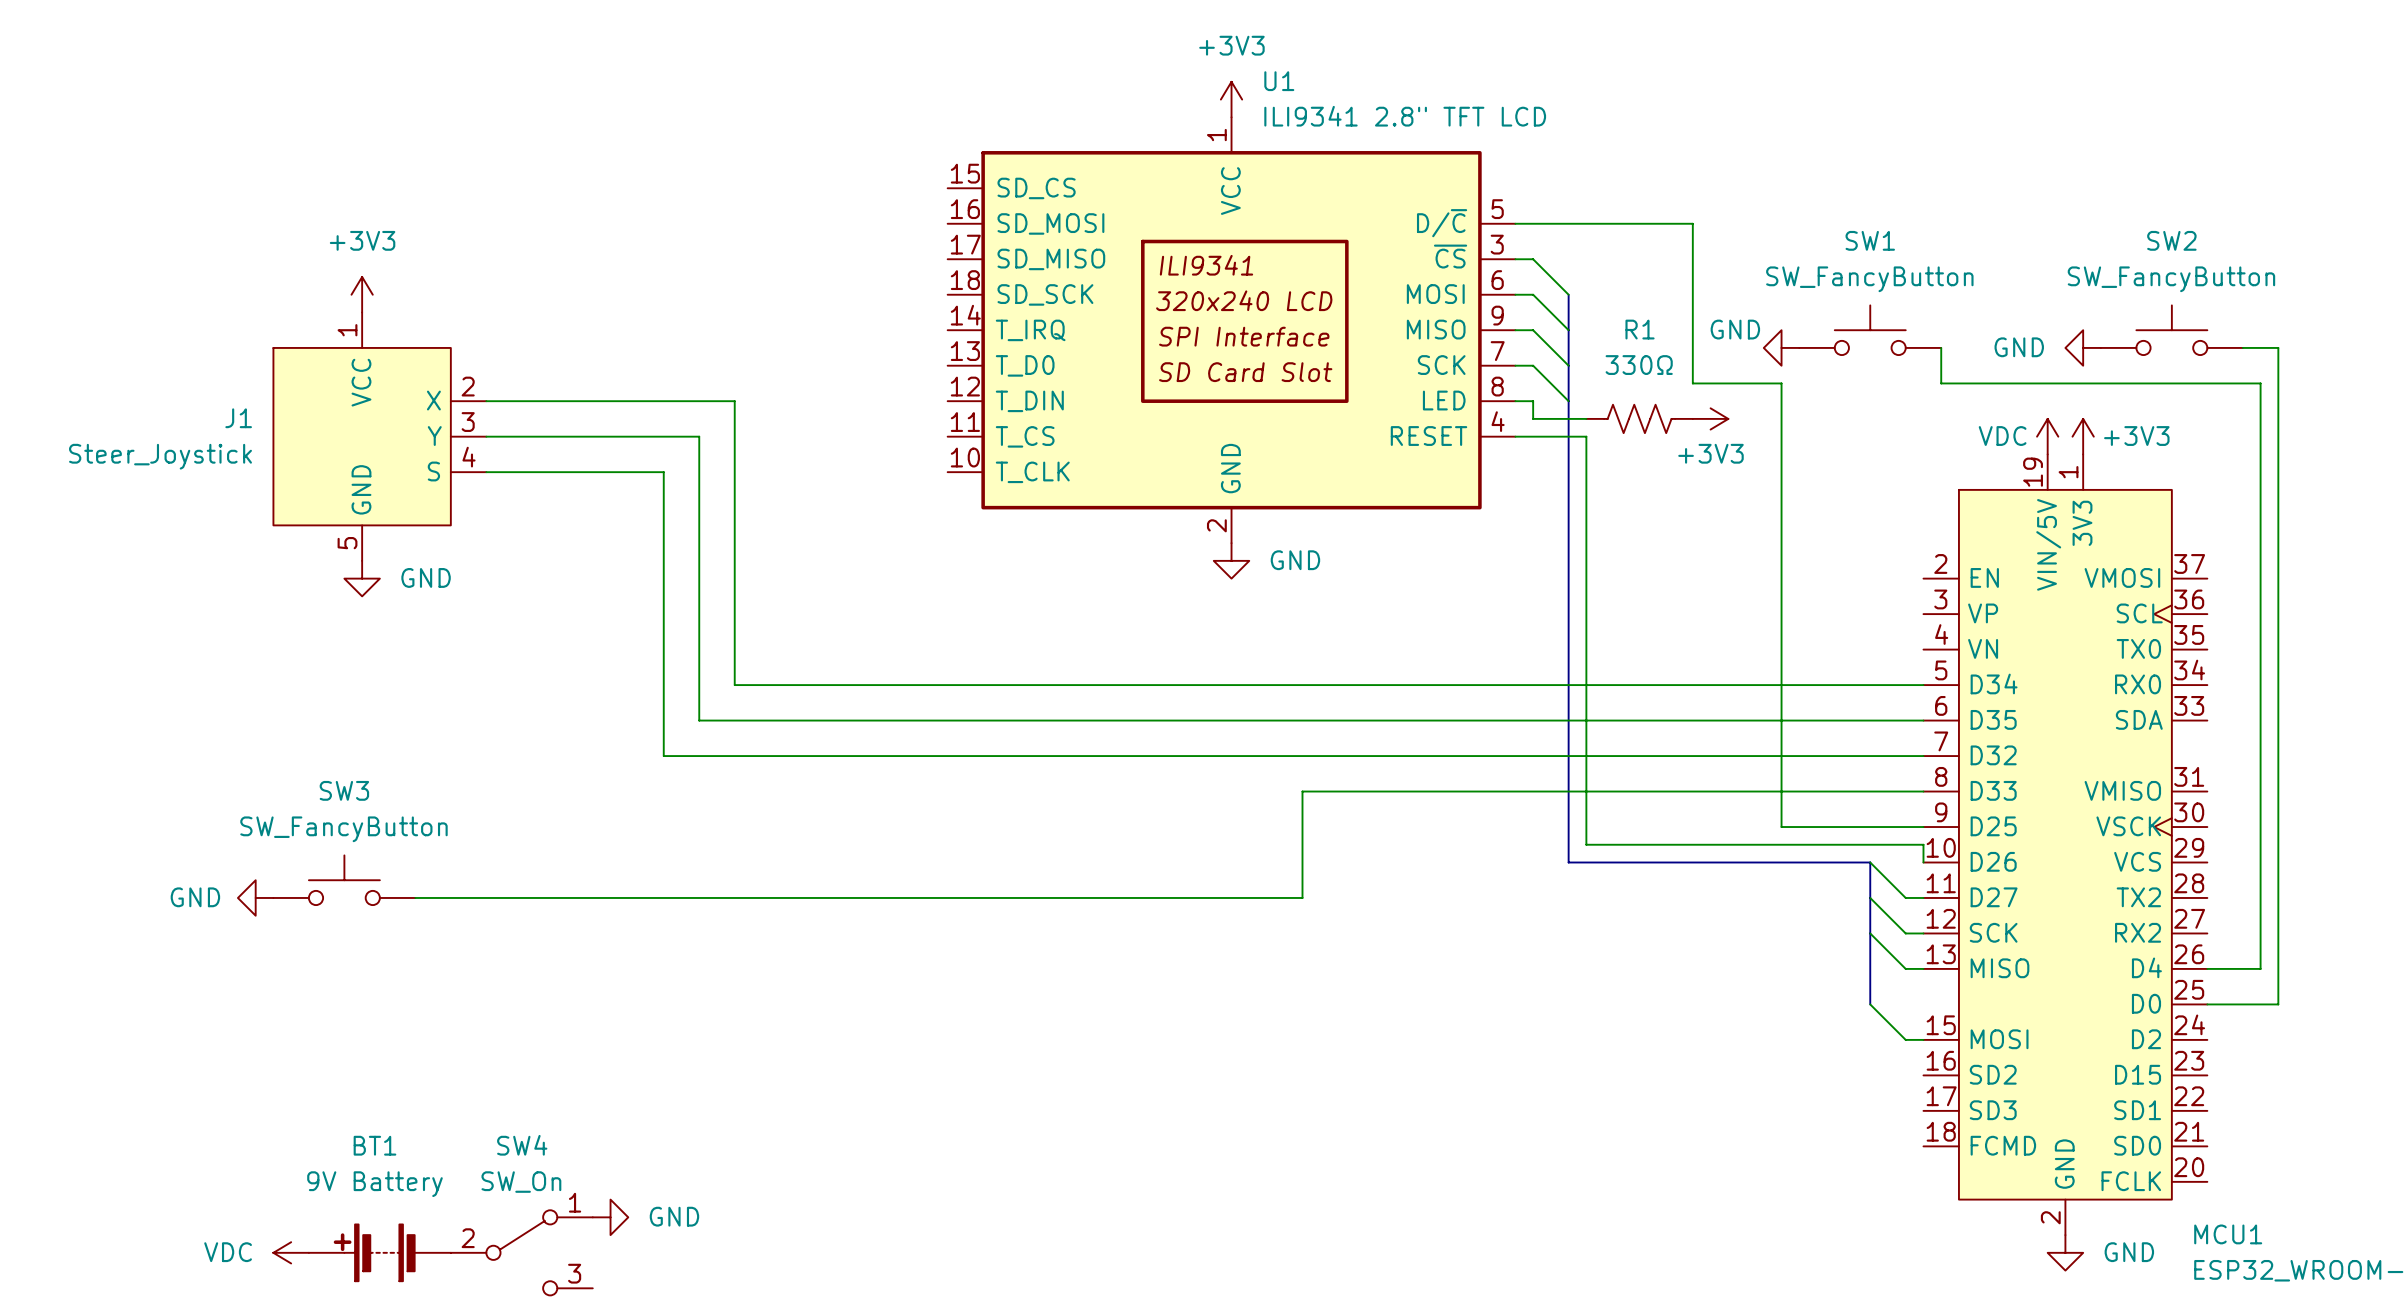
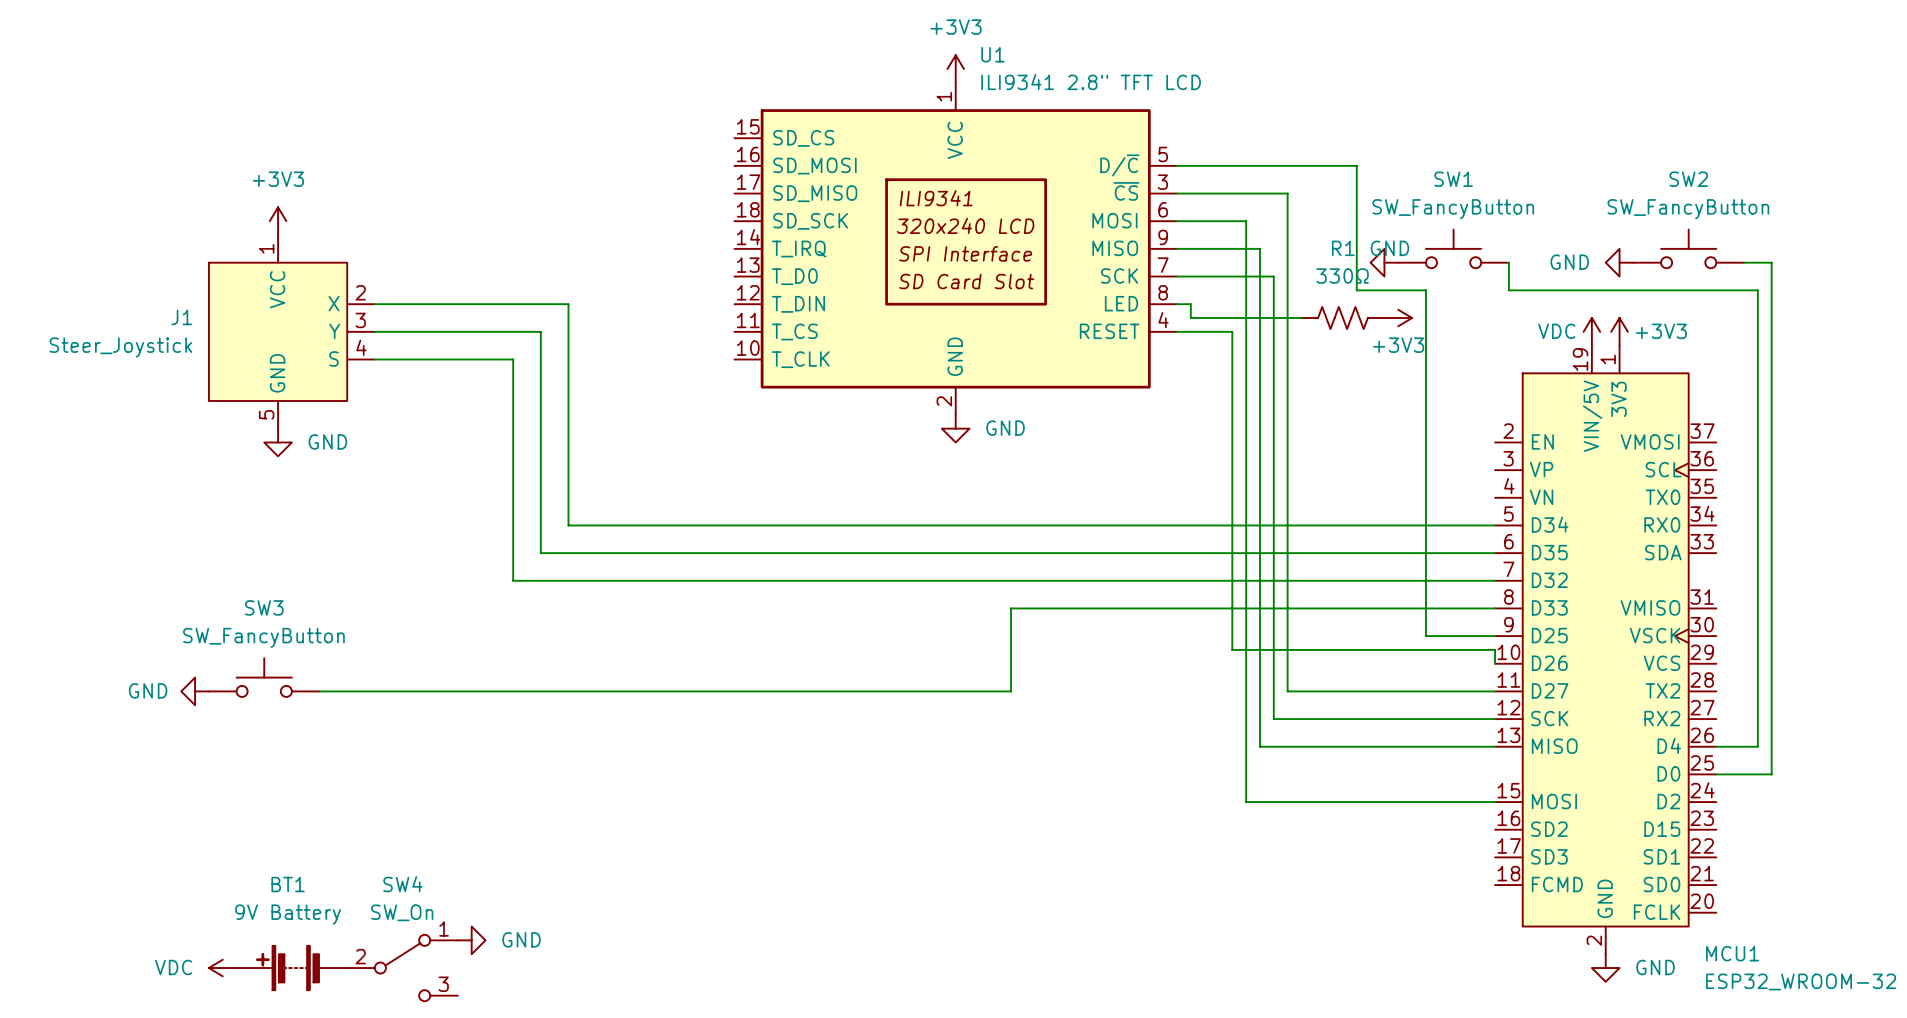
wire: (1692, 223) (1692, 383) (1746, 383) -> (1315, 165) (1356, 165) (1356, 290)
wire: (1533, 259) (1568, 294) -> (1190, 193) (1287, 193) (1287, 691) (1481, 691)
wire: (1533, 294) (1568, 330) -> (1190, 221) (1246, 221) (1246, 802) (1481, 802)
bus: (1568, 294) (1568, 862) (1870, 862) (1870, 1004) -> none
power symbol text position: GND (1735, 329) -> GND (1389, 248)
wire: (1533, 330) (1568, 365) -> (1190, 248) (1259, 248) (1259, 746) (1481, 746)
wire: (1533, 365) (1568, 401) -> (1190, 276) (1273, 276) (1273, 719) (1481, 719)
wire: (1781, 383) (1781, 827) (1834, 827) -> (1384, 290) (1425, 290) (1425, 636)
wire: none -> (1232, 318) (1301, 318)
R1 position: (1639, 418) -> (1342, 318)
power symbol position: +3V3 (1710, 418) -> +3V3 (1398, 318)
wire: (1870, 862) (1905, 897) -> none
wire: (1870, 897) (1905, 933) -> none
wire: (1870, 933) (1905, 968) -> none
wire: (1870, 1004) (1905, 1039) -> none

